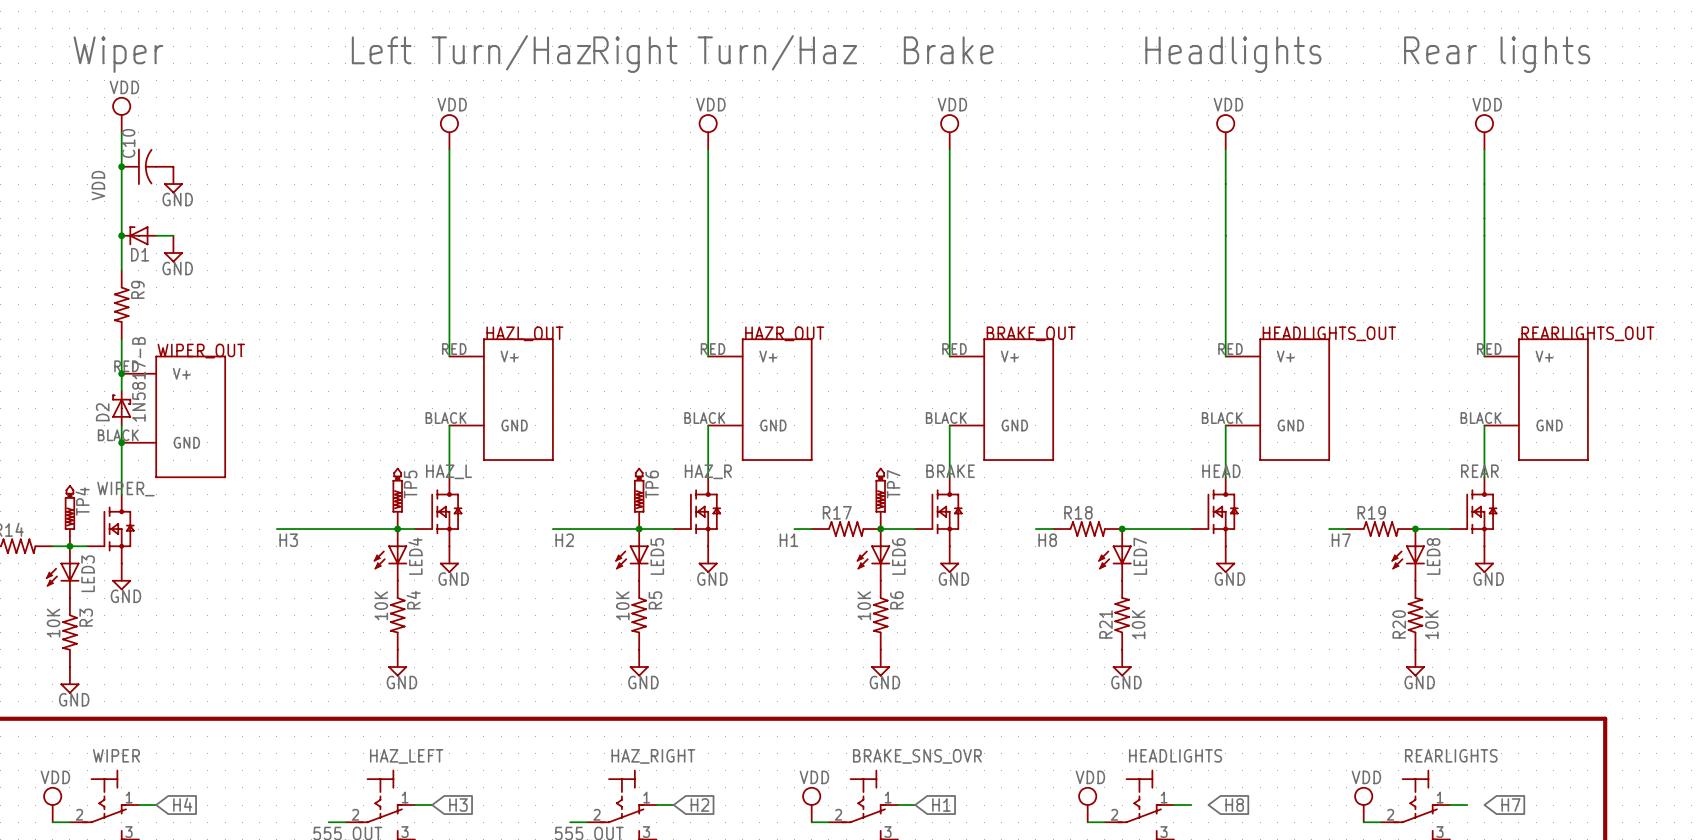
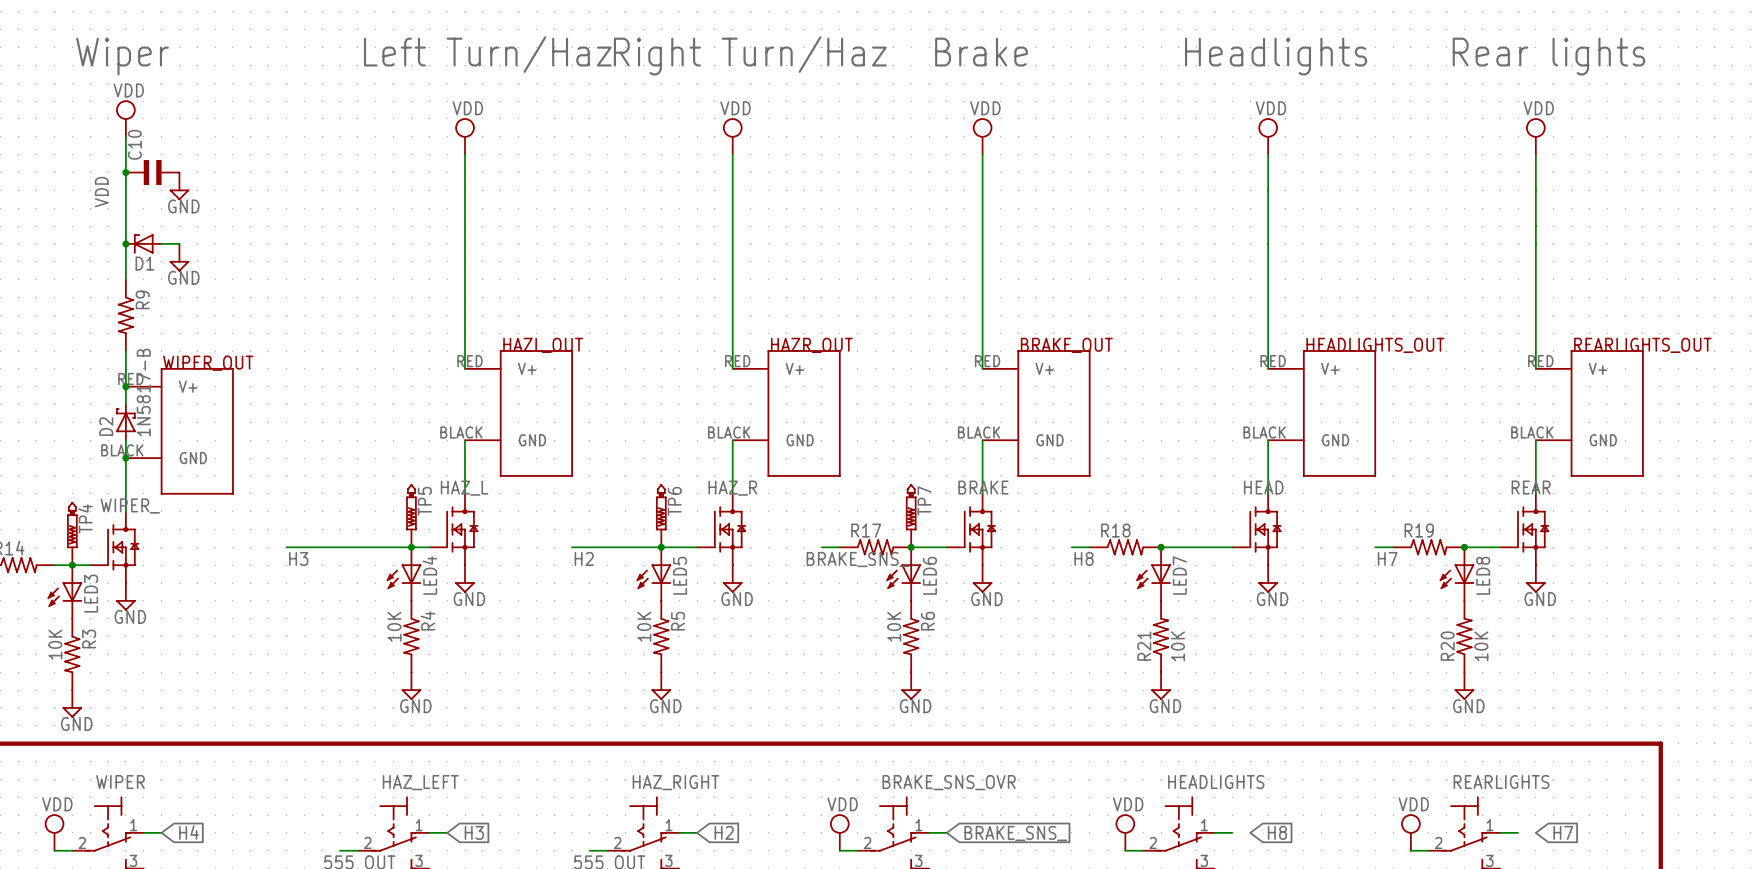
C10 symbol: [121, 148, 174, 185] -> [125, 160, 180, 186]
label: H1 (788, 540) -> BRAKE_SNS_ (858, 559)
global label: H1 (941, 805) -> BRAKE_SNS_ (1015, 833)

